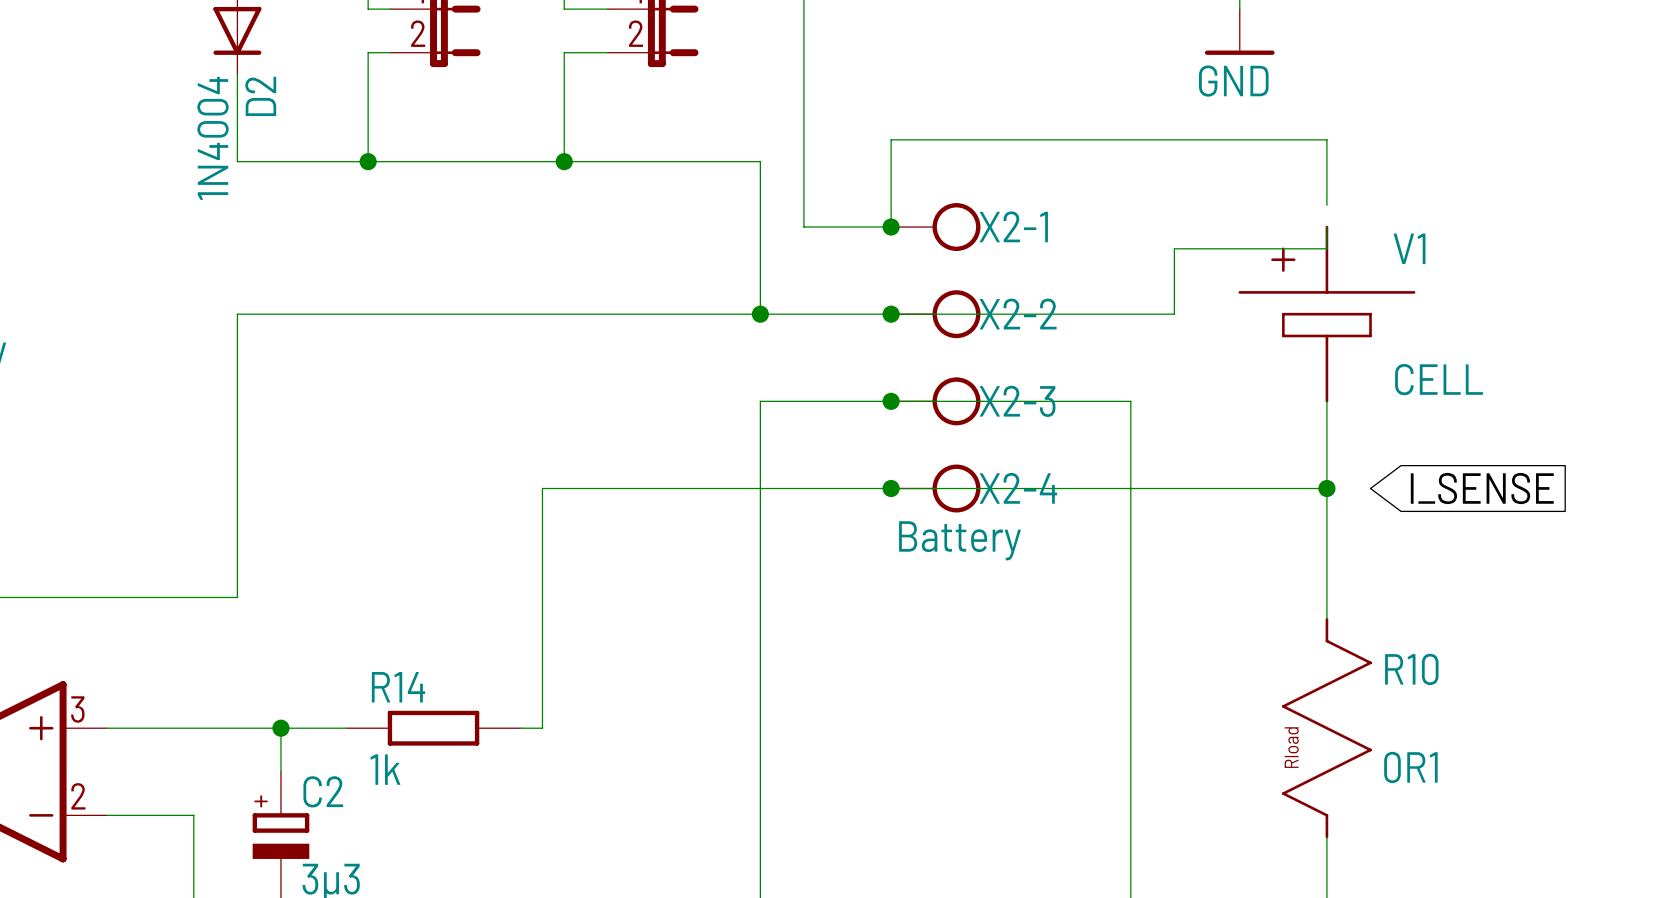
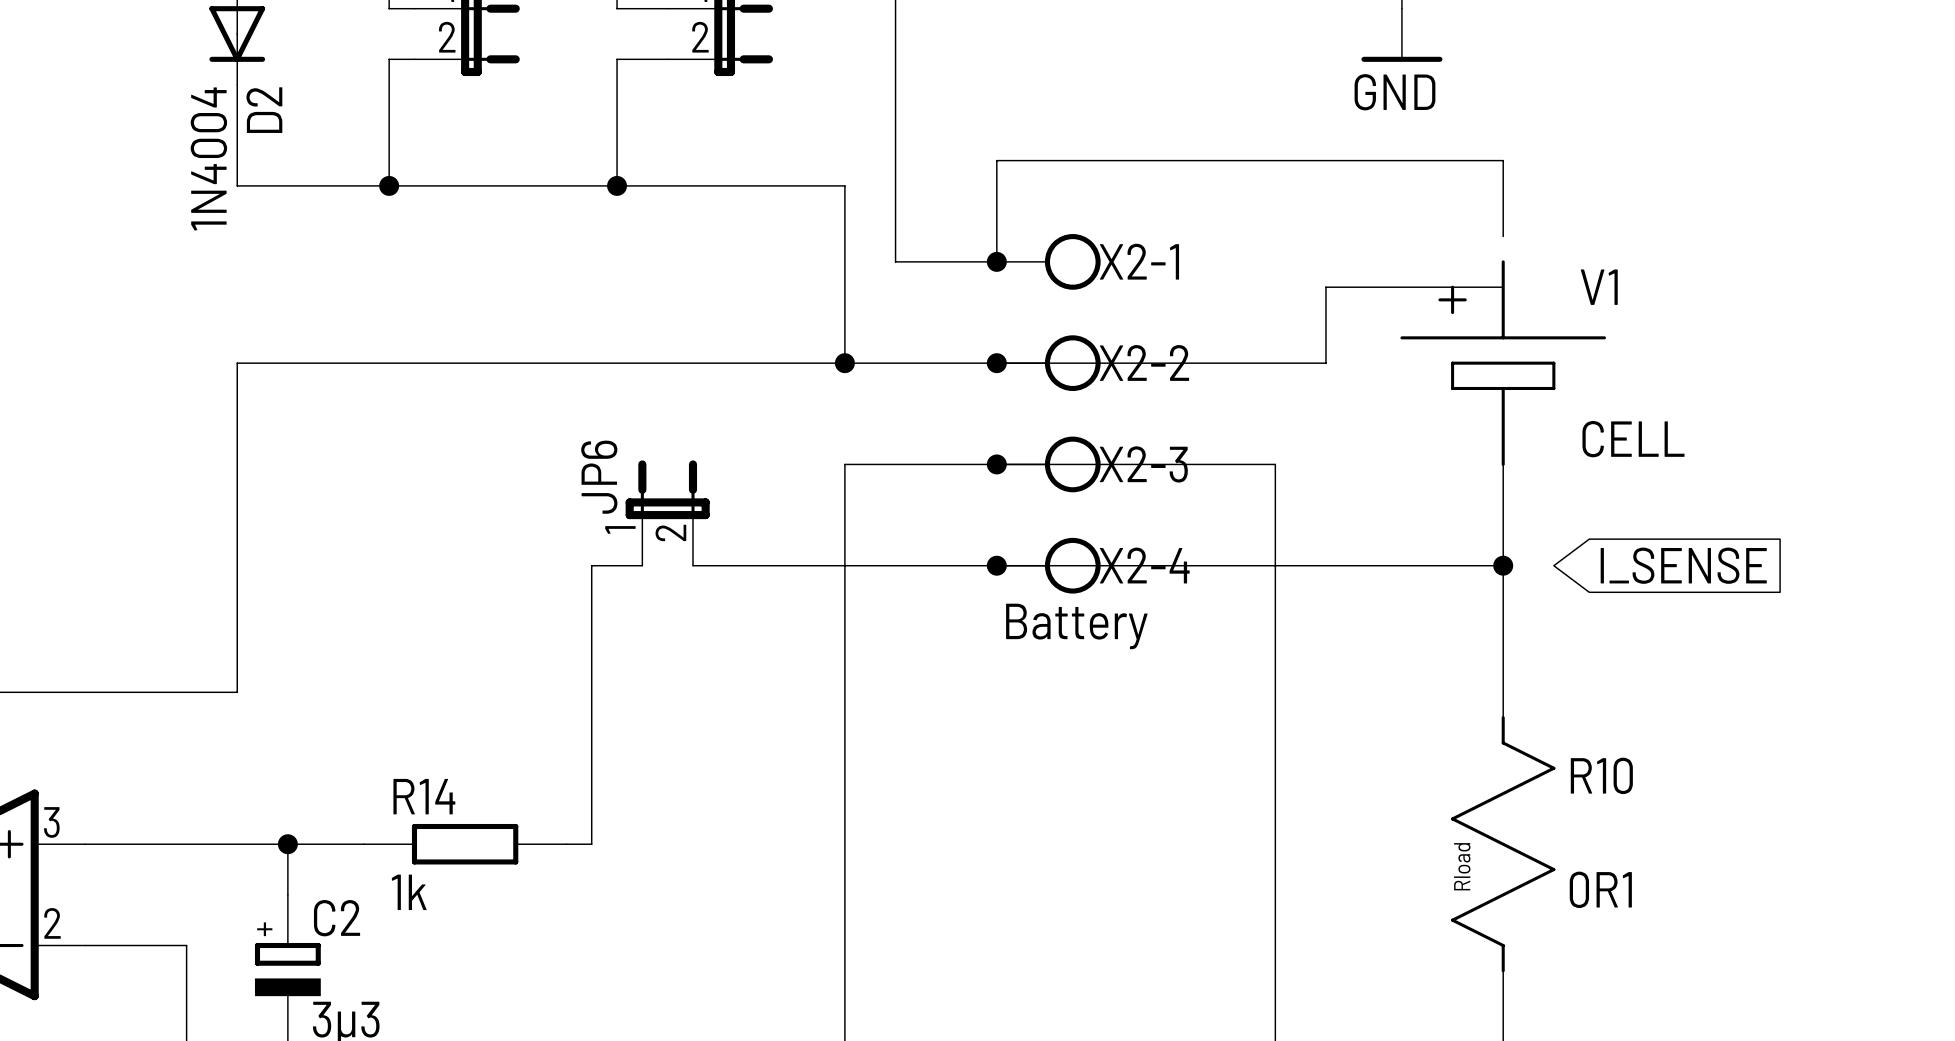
JP6: none -> (667, 513)
wire: (586, 488) (629, 488) -> none

